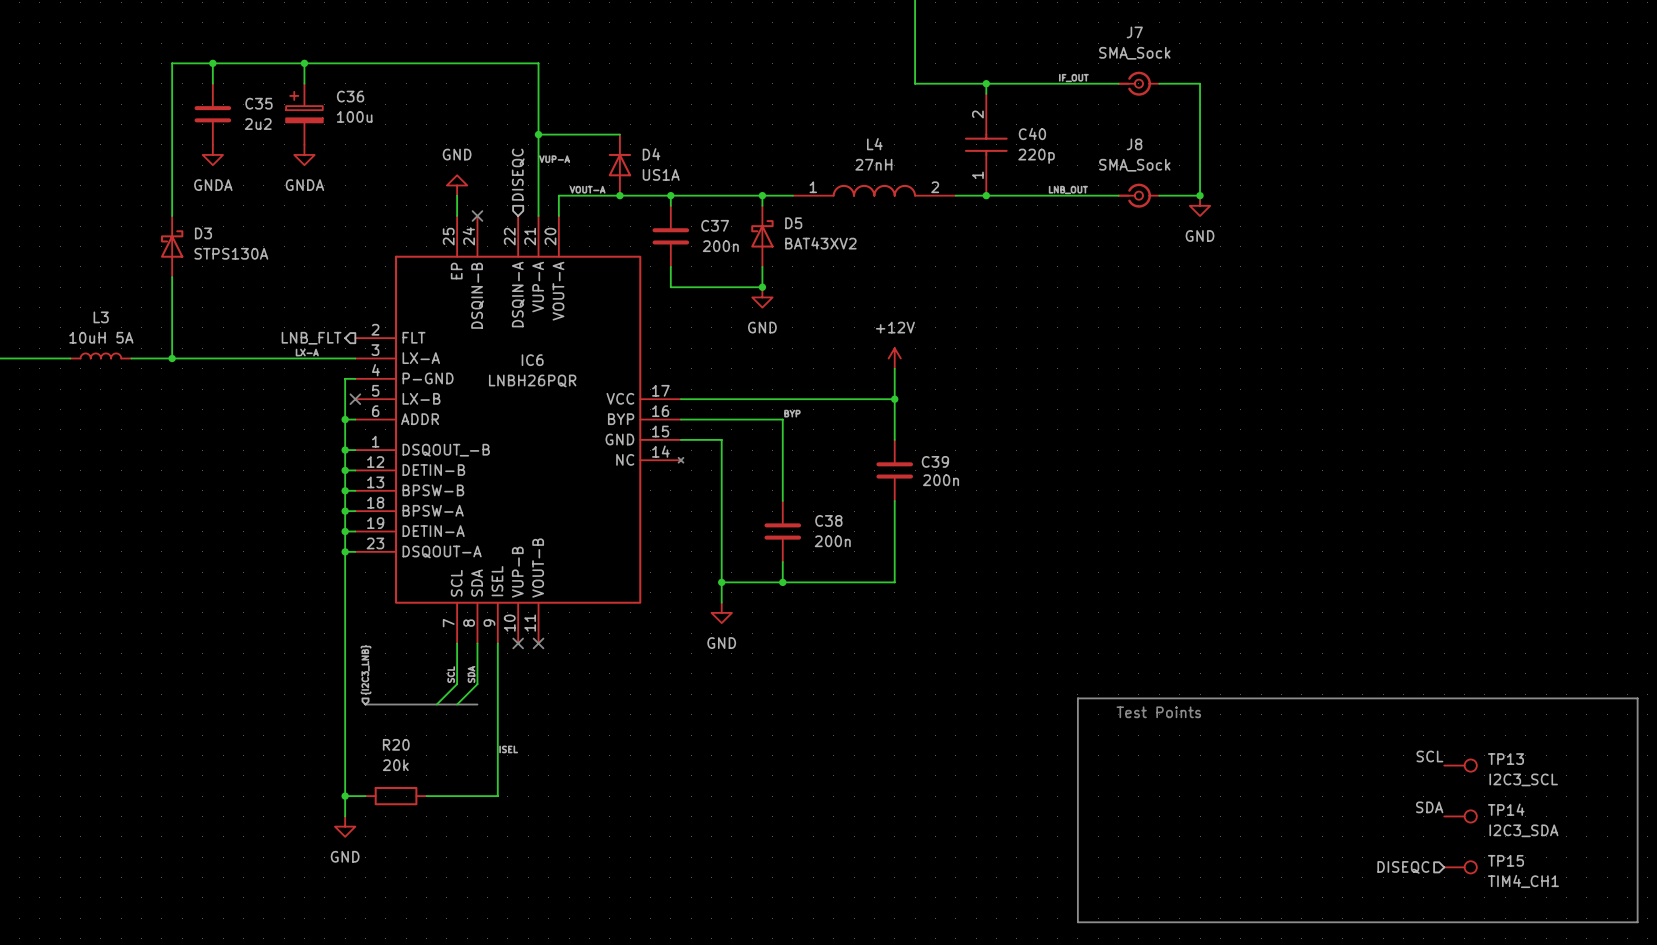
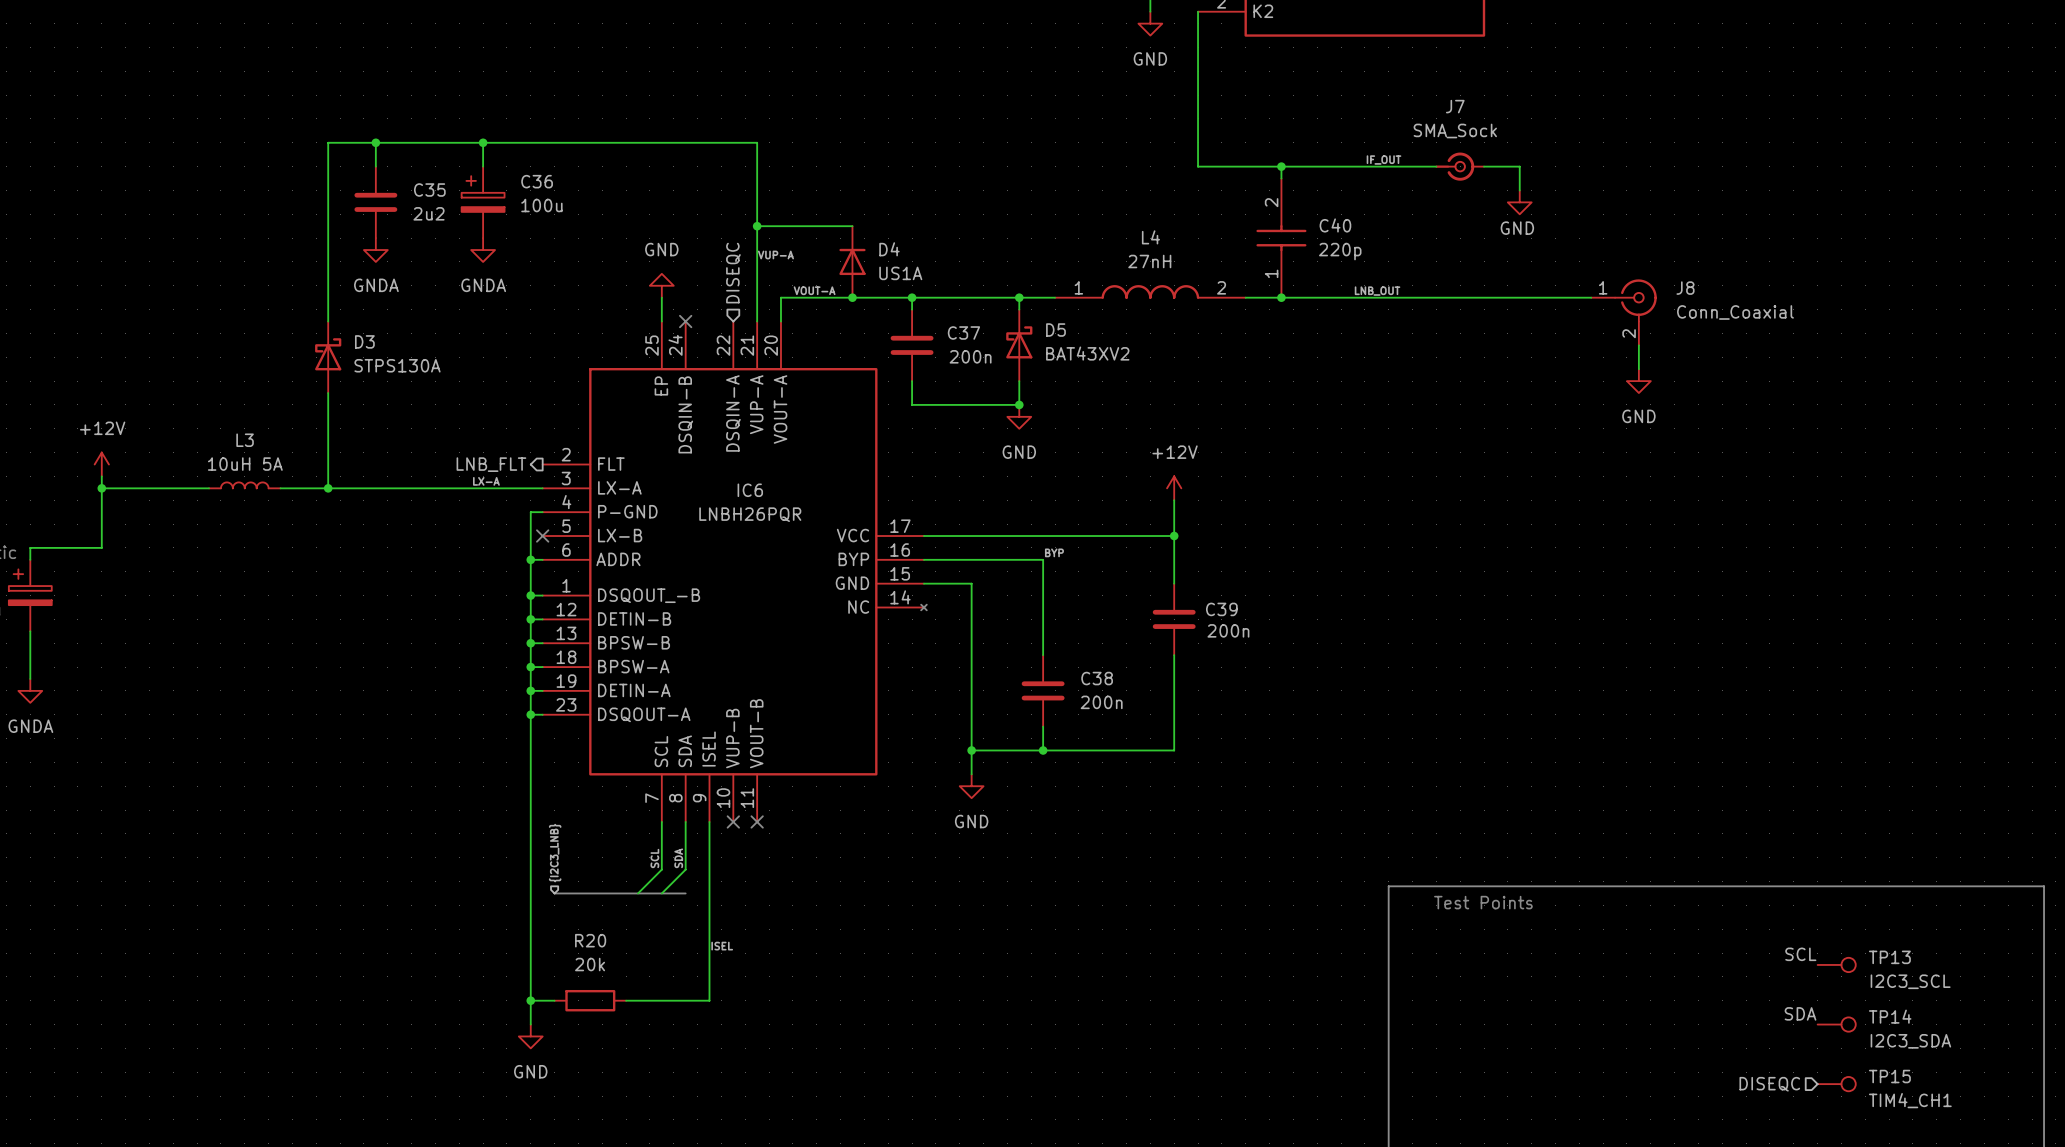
wire: (1189, 83) (1200, 83) (1200, 195) -> (1519, 166) (1519, 190)
power symbol: none -> GND (1519, 202)
J8 name position: J8 (1134, 144) -> J8 (1685, 288)
J8 value: SMA_Sock (1134, 165) -> Conn_Coaxial (1735, 312)
J8 symbol: [1118, 183, 1160, 208] -> [1591, 279, 1657, 346]
wire: none -> (1531, 297) (1591, 297)
junction: (1200, 195) -> none
power symbol: GND (1200, 205) -> none
wire: none -> (1638, 345) (1638, 369)
power symbol: none -> GND (1638, 381)

